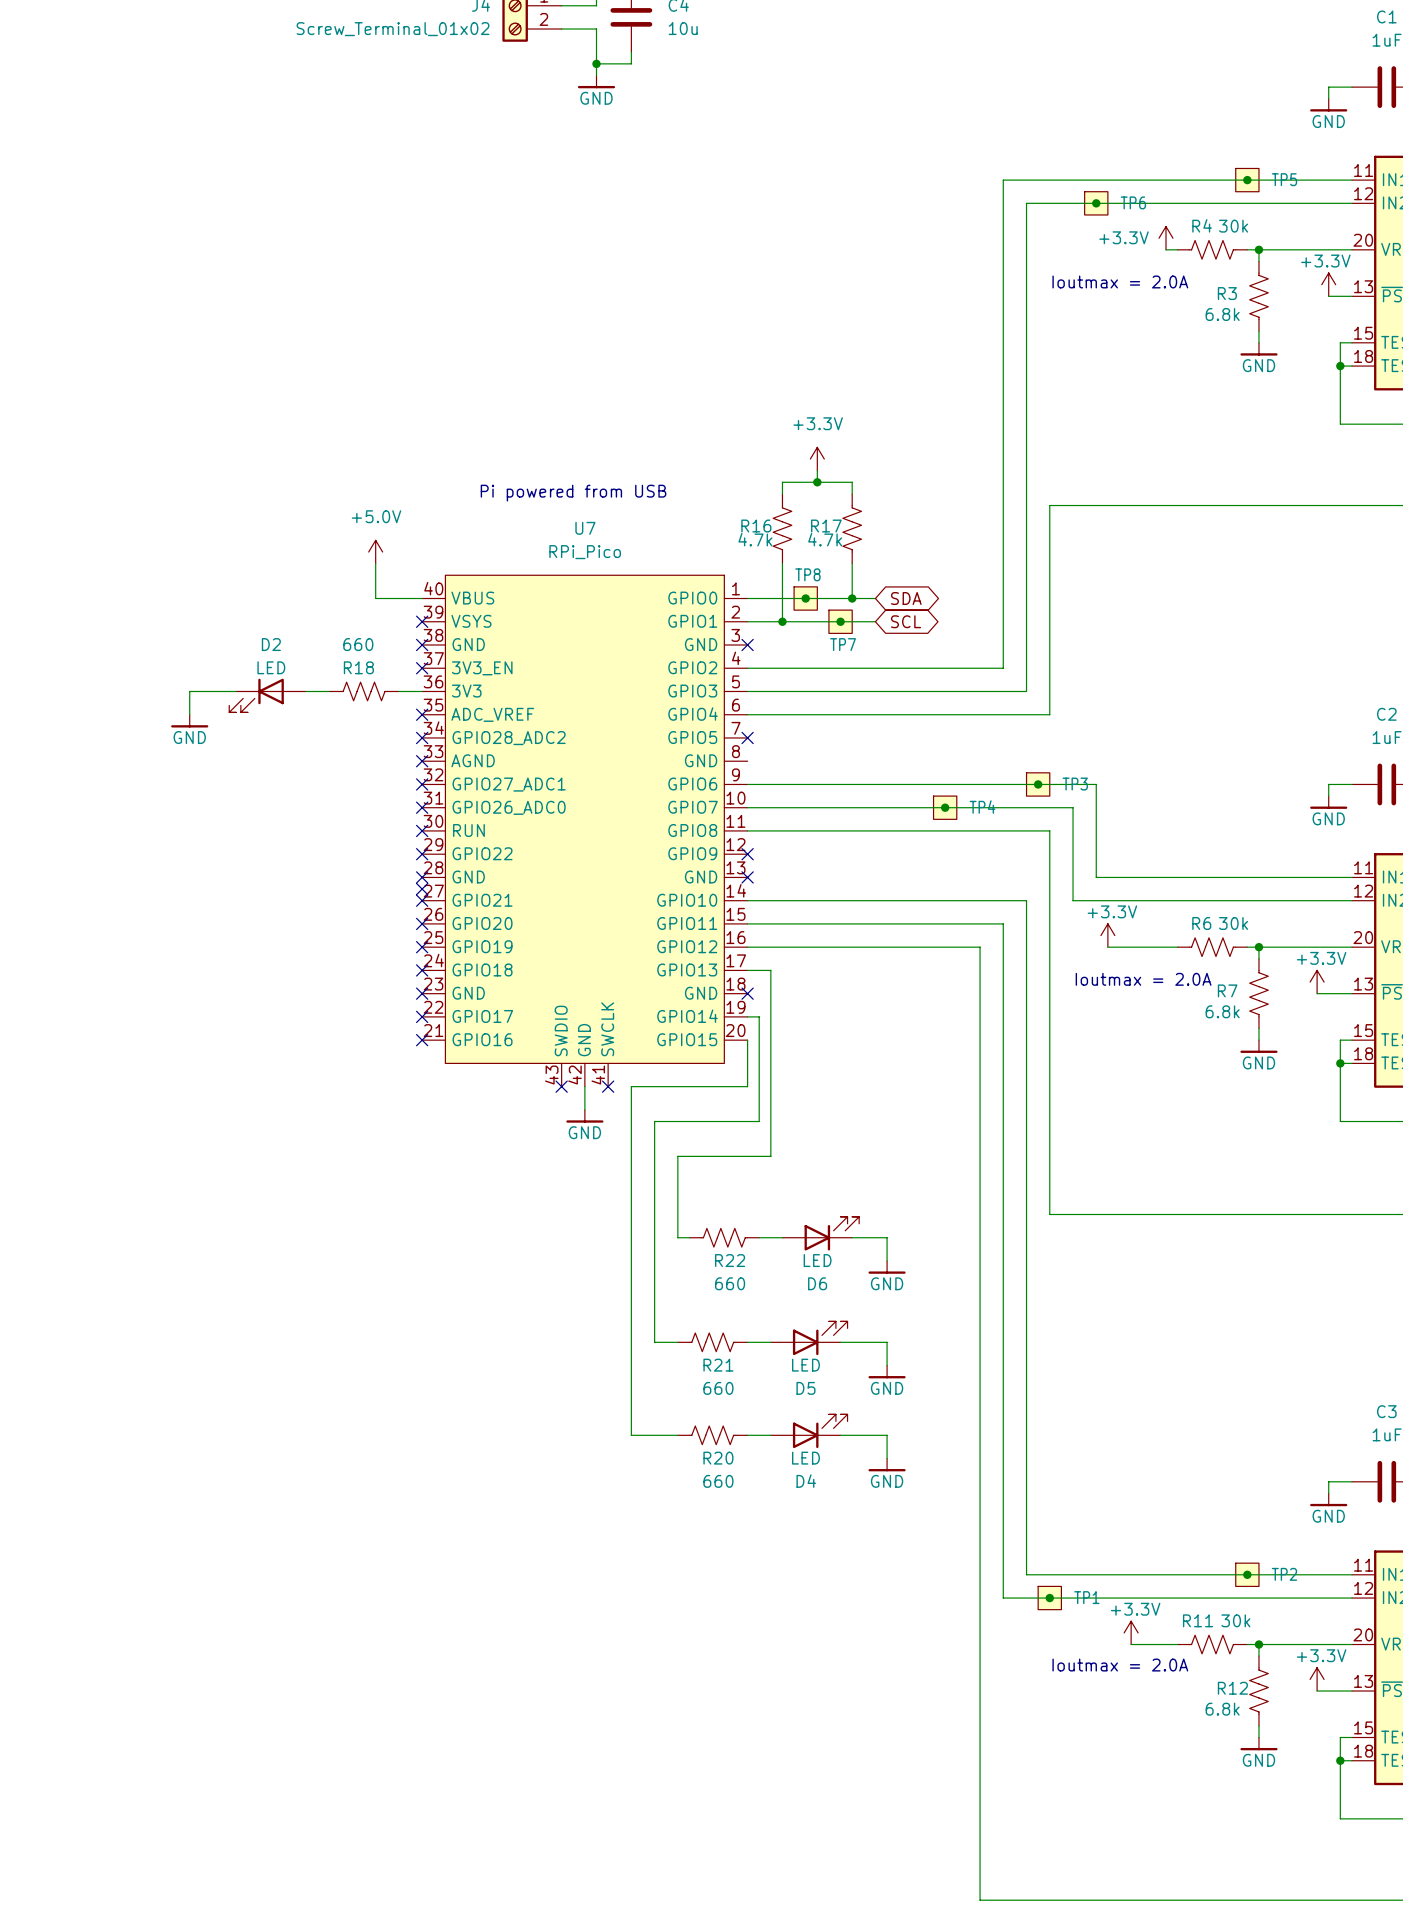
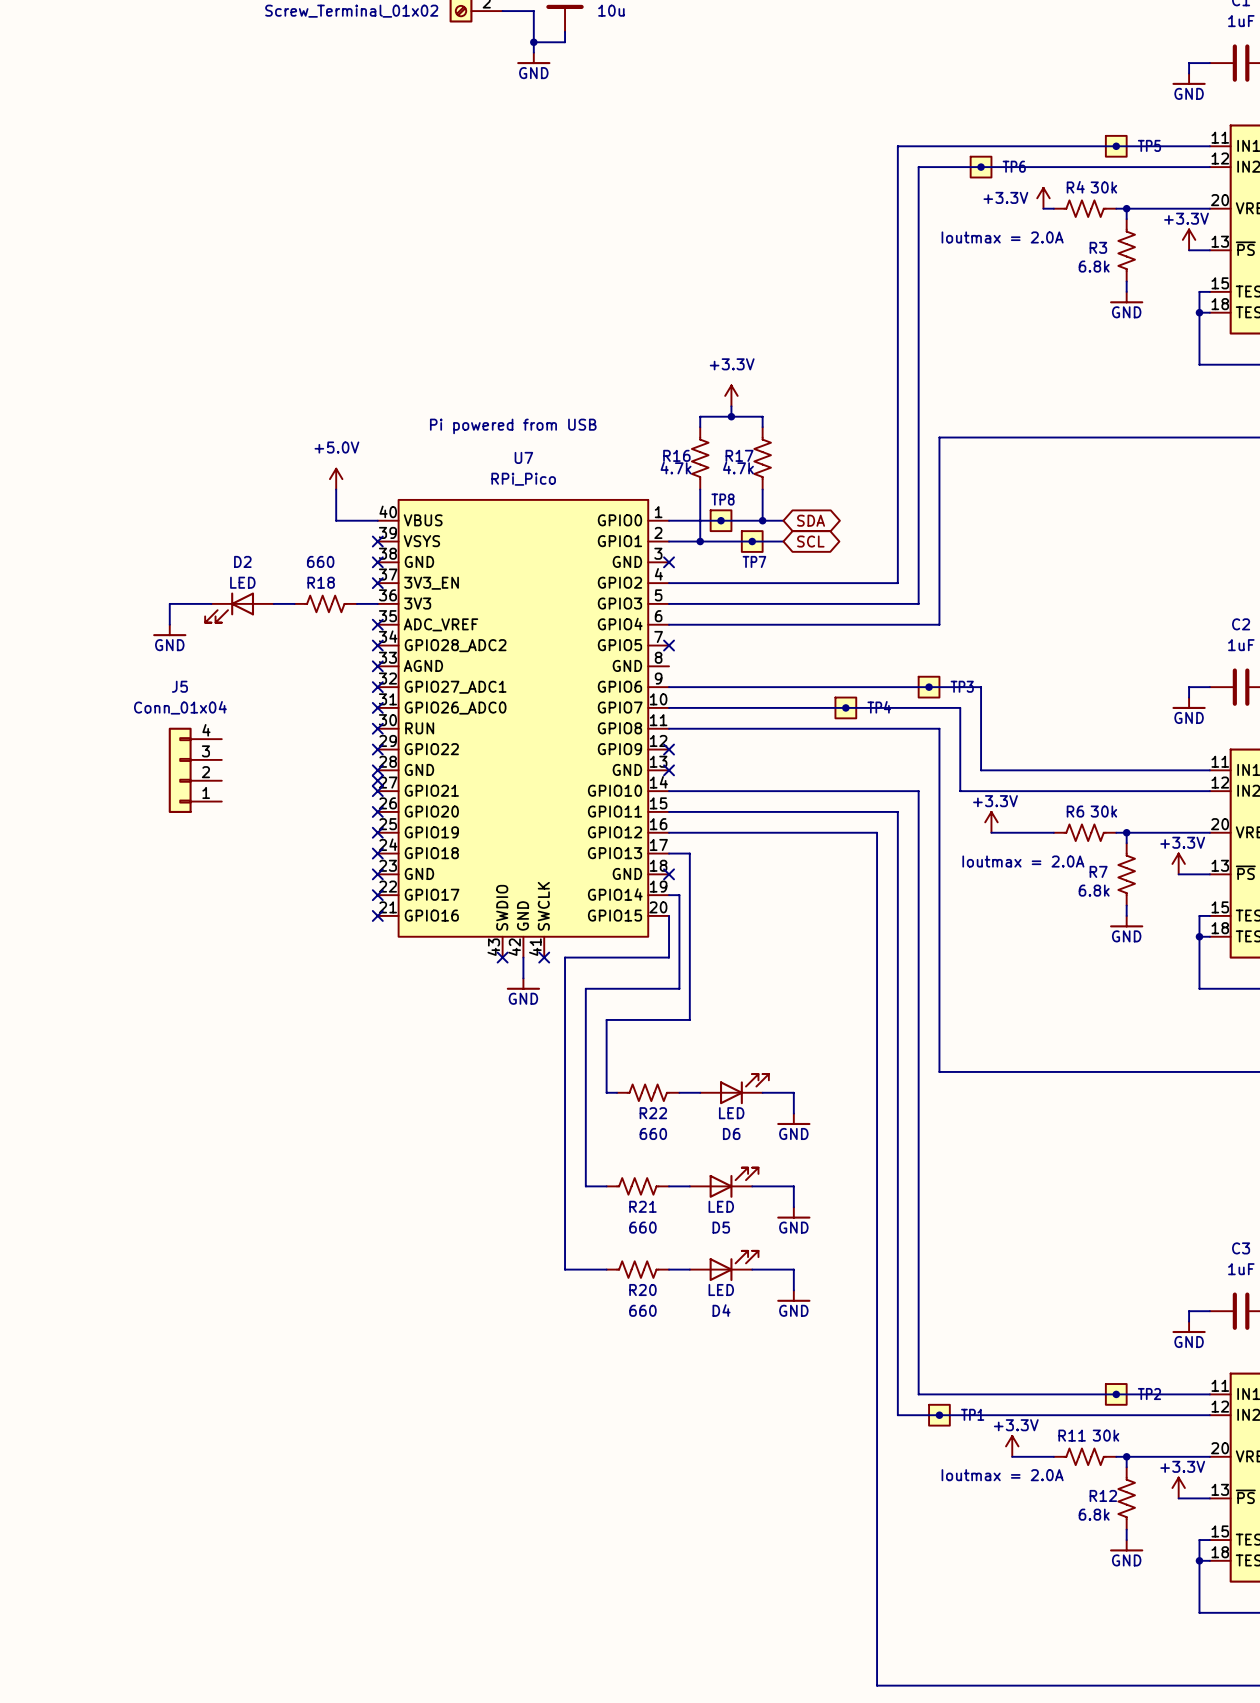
J5: none -> Conn_01x04 (195, 770)

